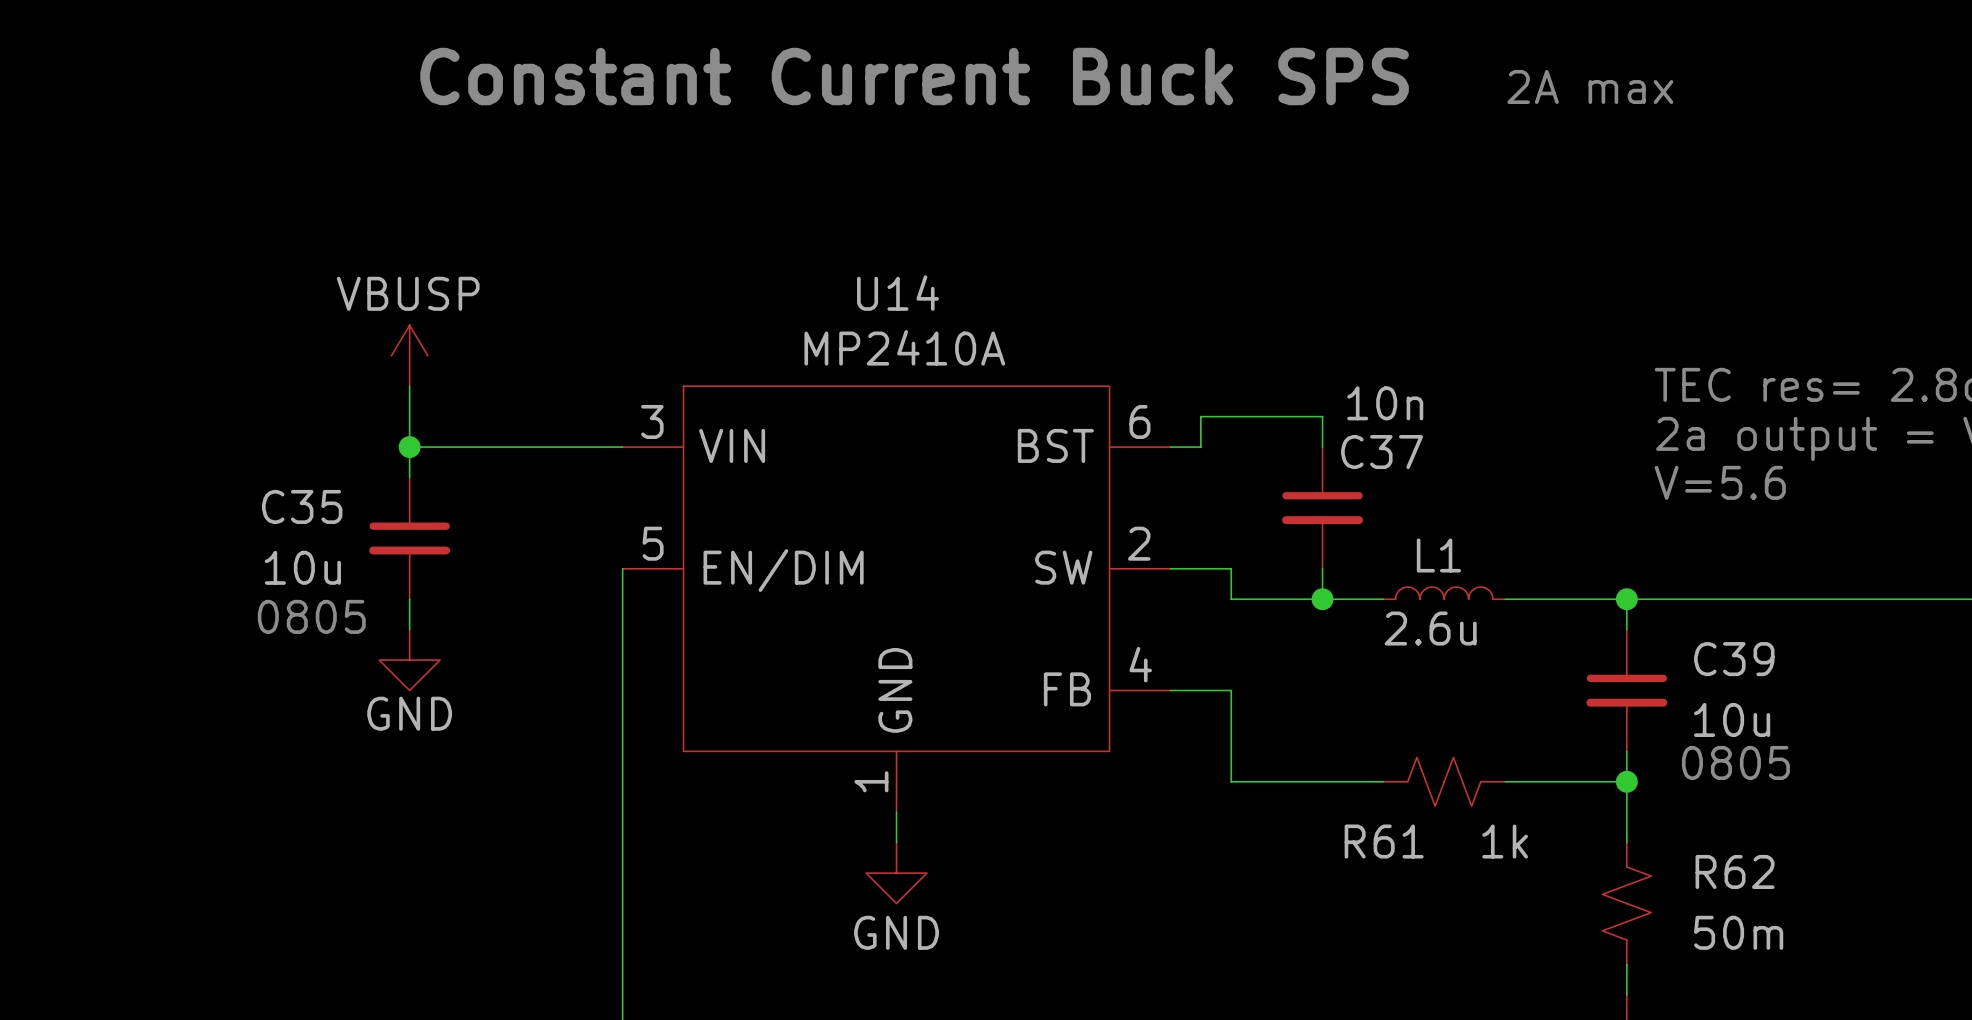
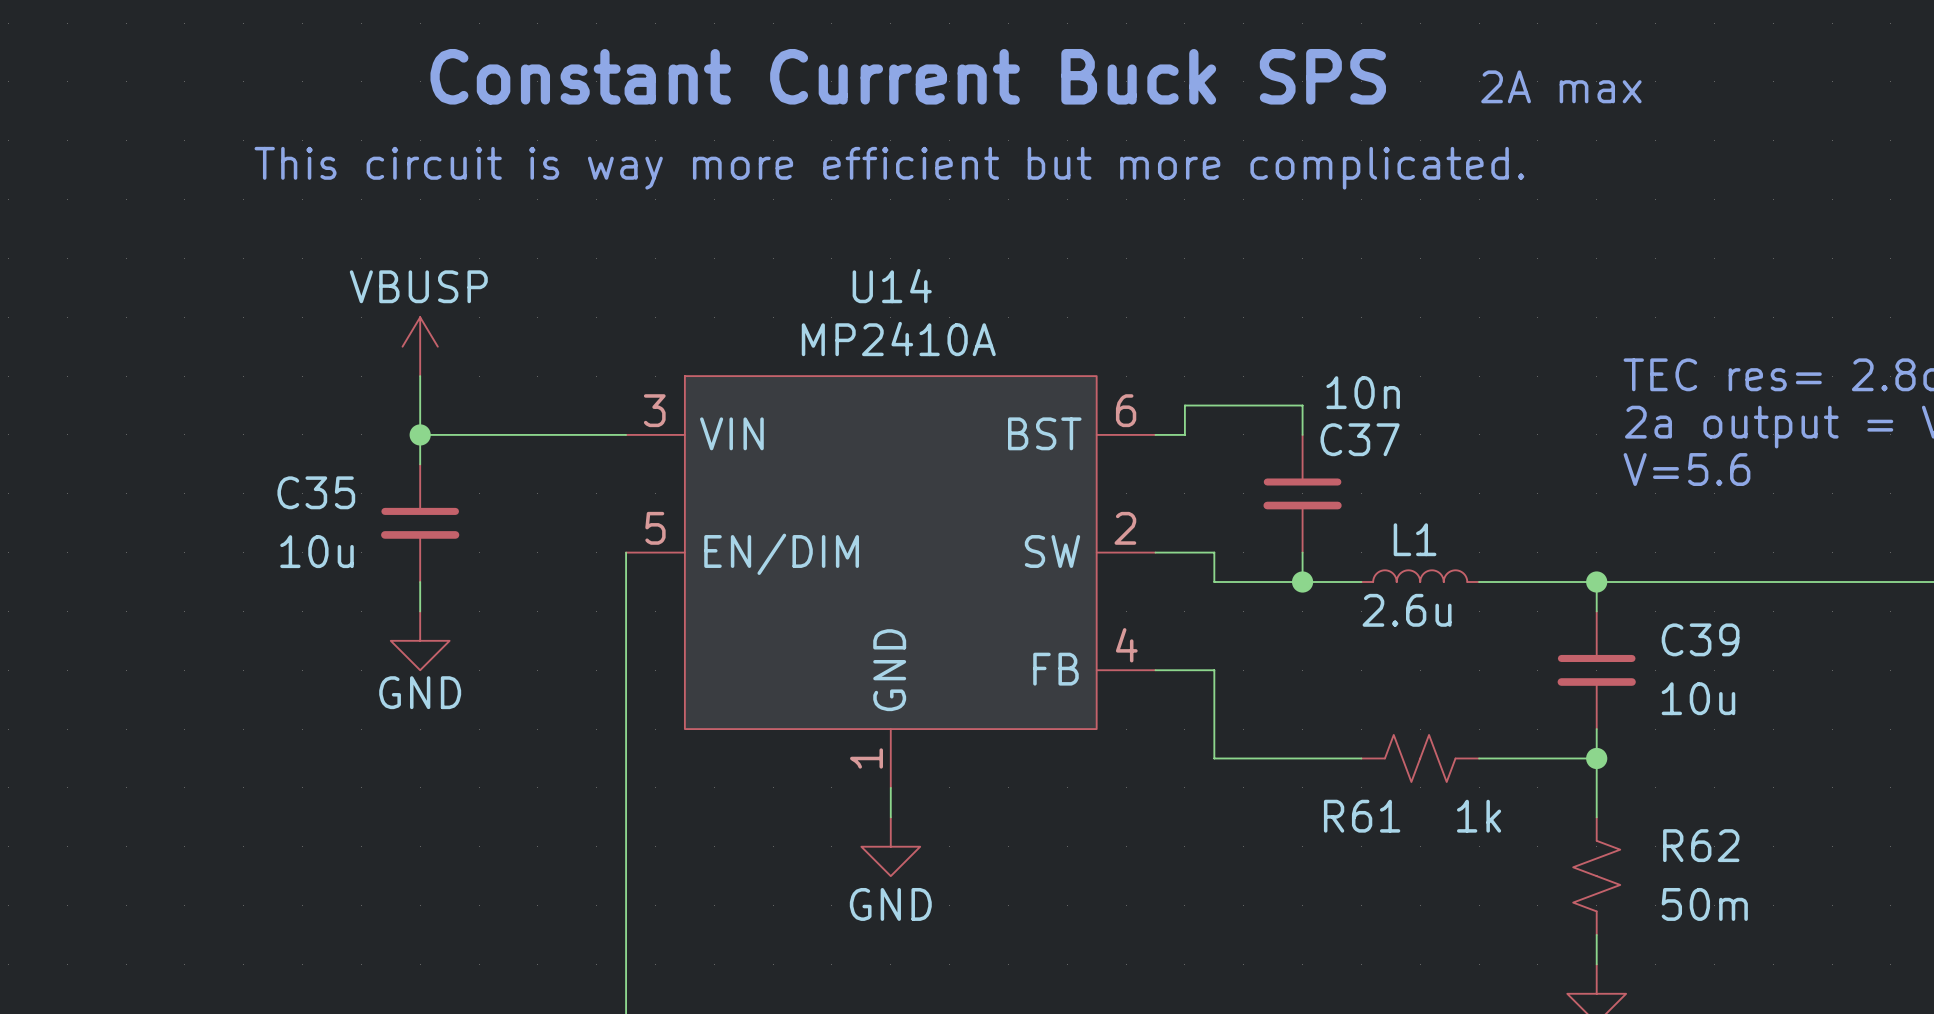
text: none -> This circuit is way more efficient but more complicated. (889, 168)
text: 0805 (311, 616) -> none
text: 0805 (1735, 762) -> none

